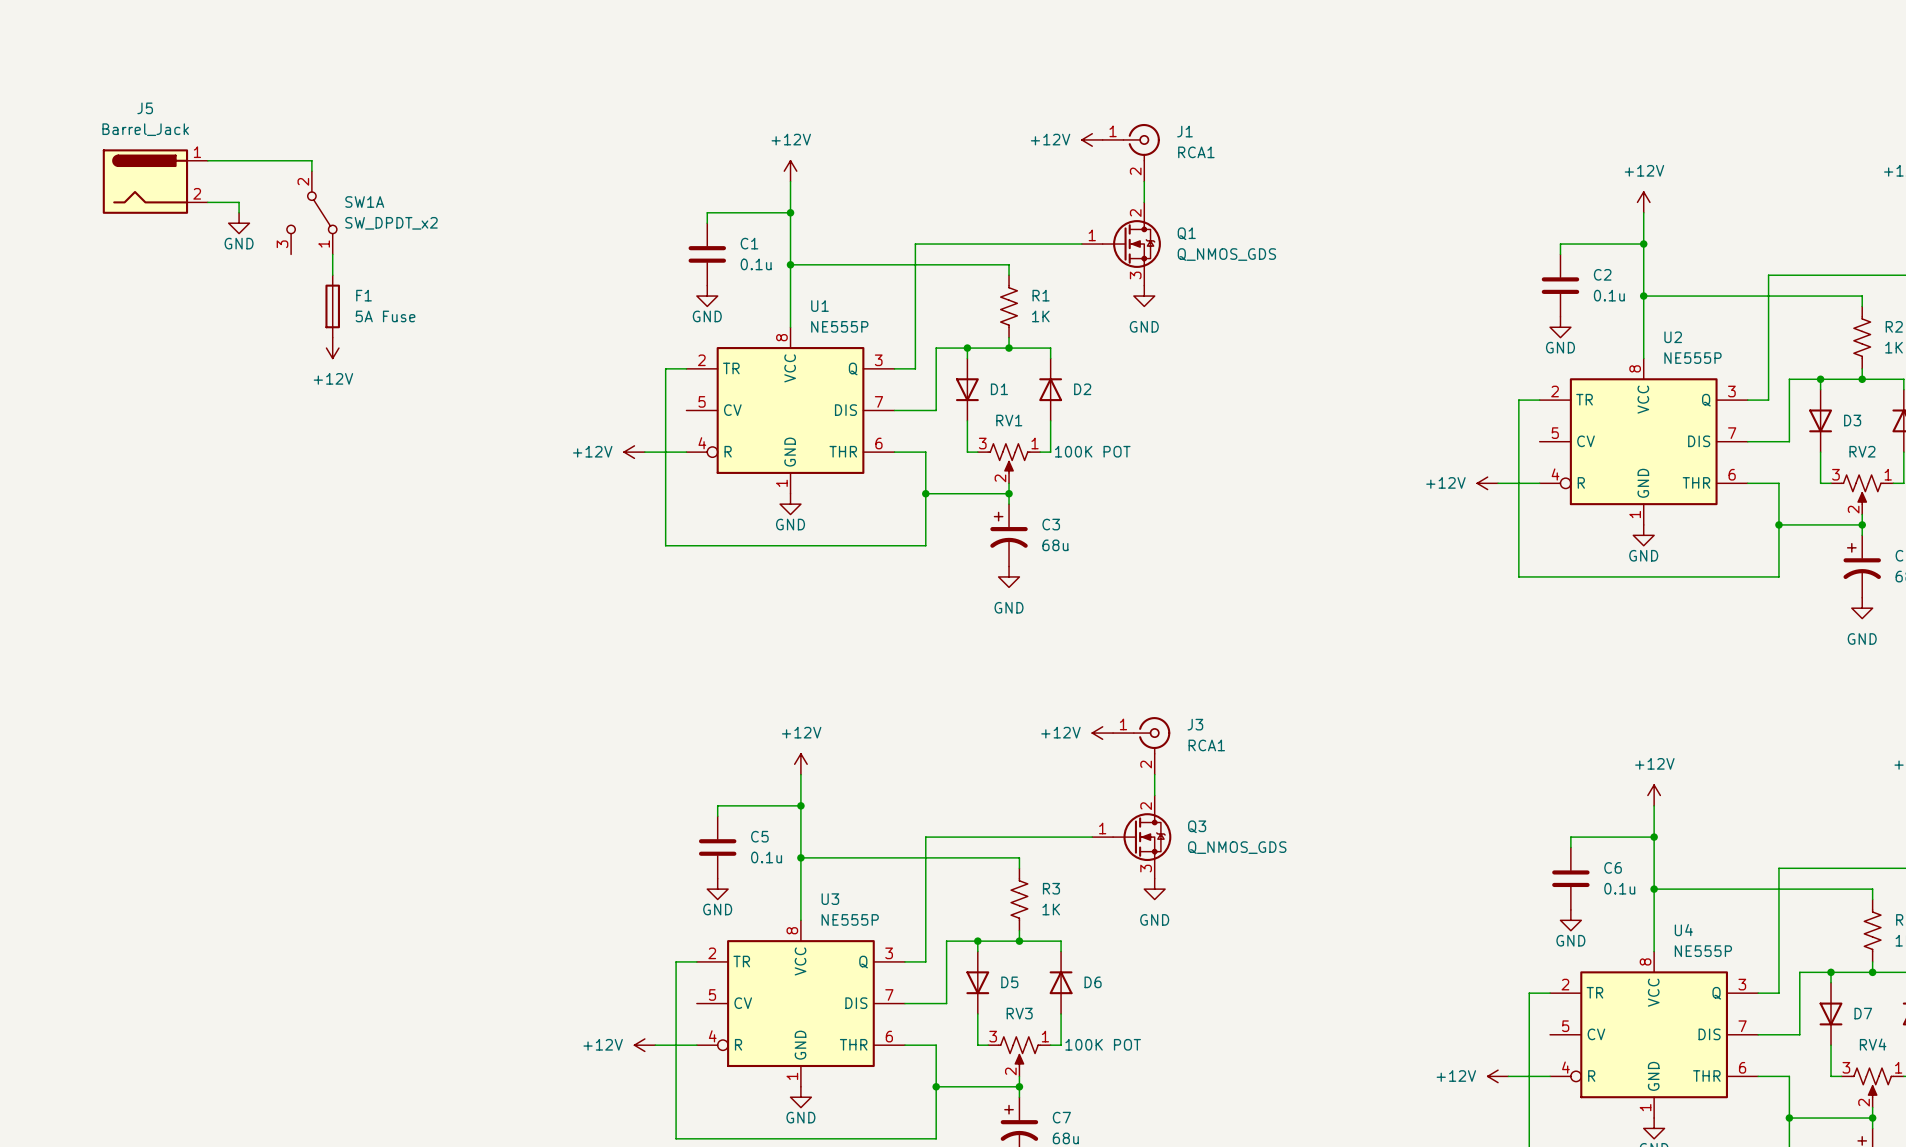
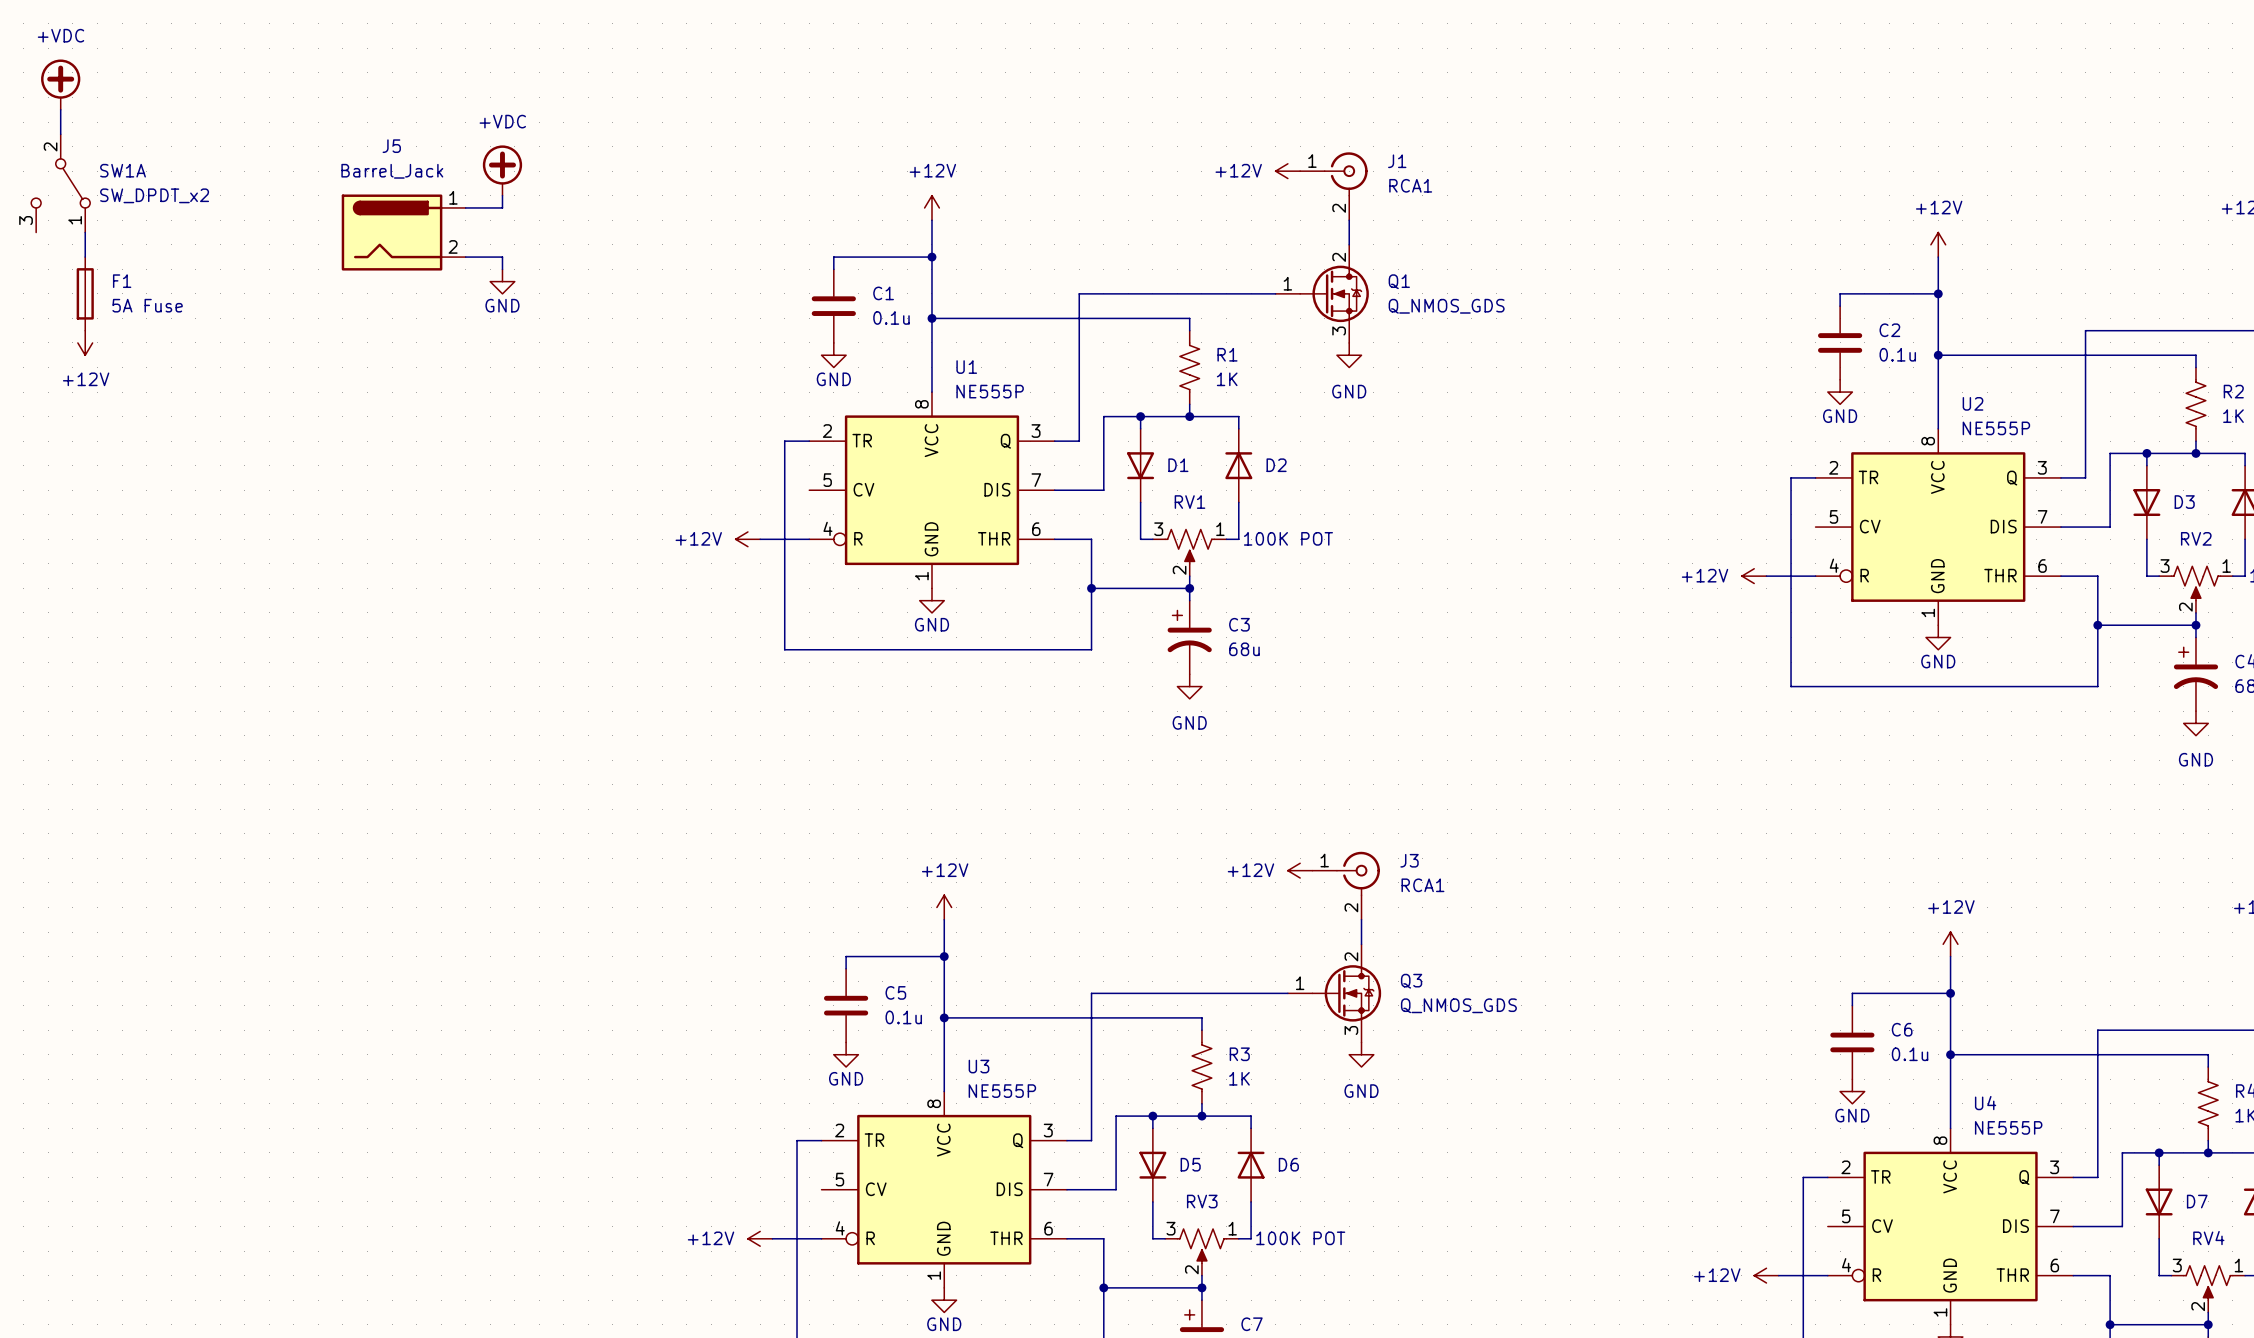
power symbol: none -> +VDC (60, 84)
wire: none -> (60, 109) (60, 134)
power symbol: none -> +VDC (502, 170)
wire: (207, 160) (311, 160) (311, 171) -> none
wire: none -> (502, 195) (502, 207) (465, 207)
J5 position: (155, 181) -> (403, 232)
wire: none -> (85, 232) (85, 257)
wire: (207, 202) (239, 202) (239, 212) -> (465, 257) (502, 257) (502, 269)
SW1A position: (311, 212) -> (60, 183)
power symbol position: GND (239, 223) -> GND (502, 281)
wire: (332, 254) (332, 275) -> none
power symbol: none -> +12V (85, 342)
F1 position: (332, 306) -> (85, 293)
power symbol: +12V (332, 348) -> none

